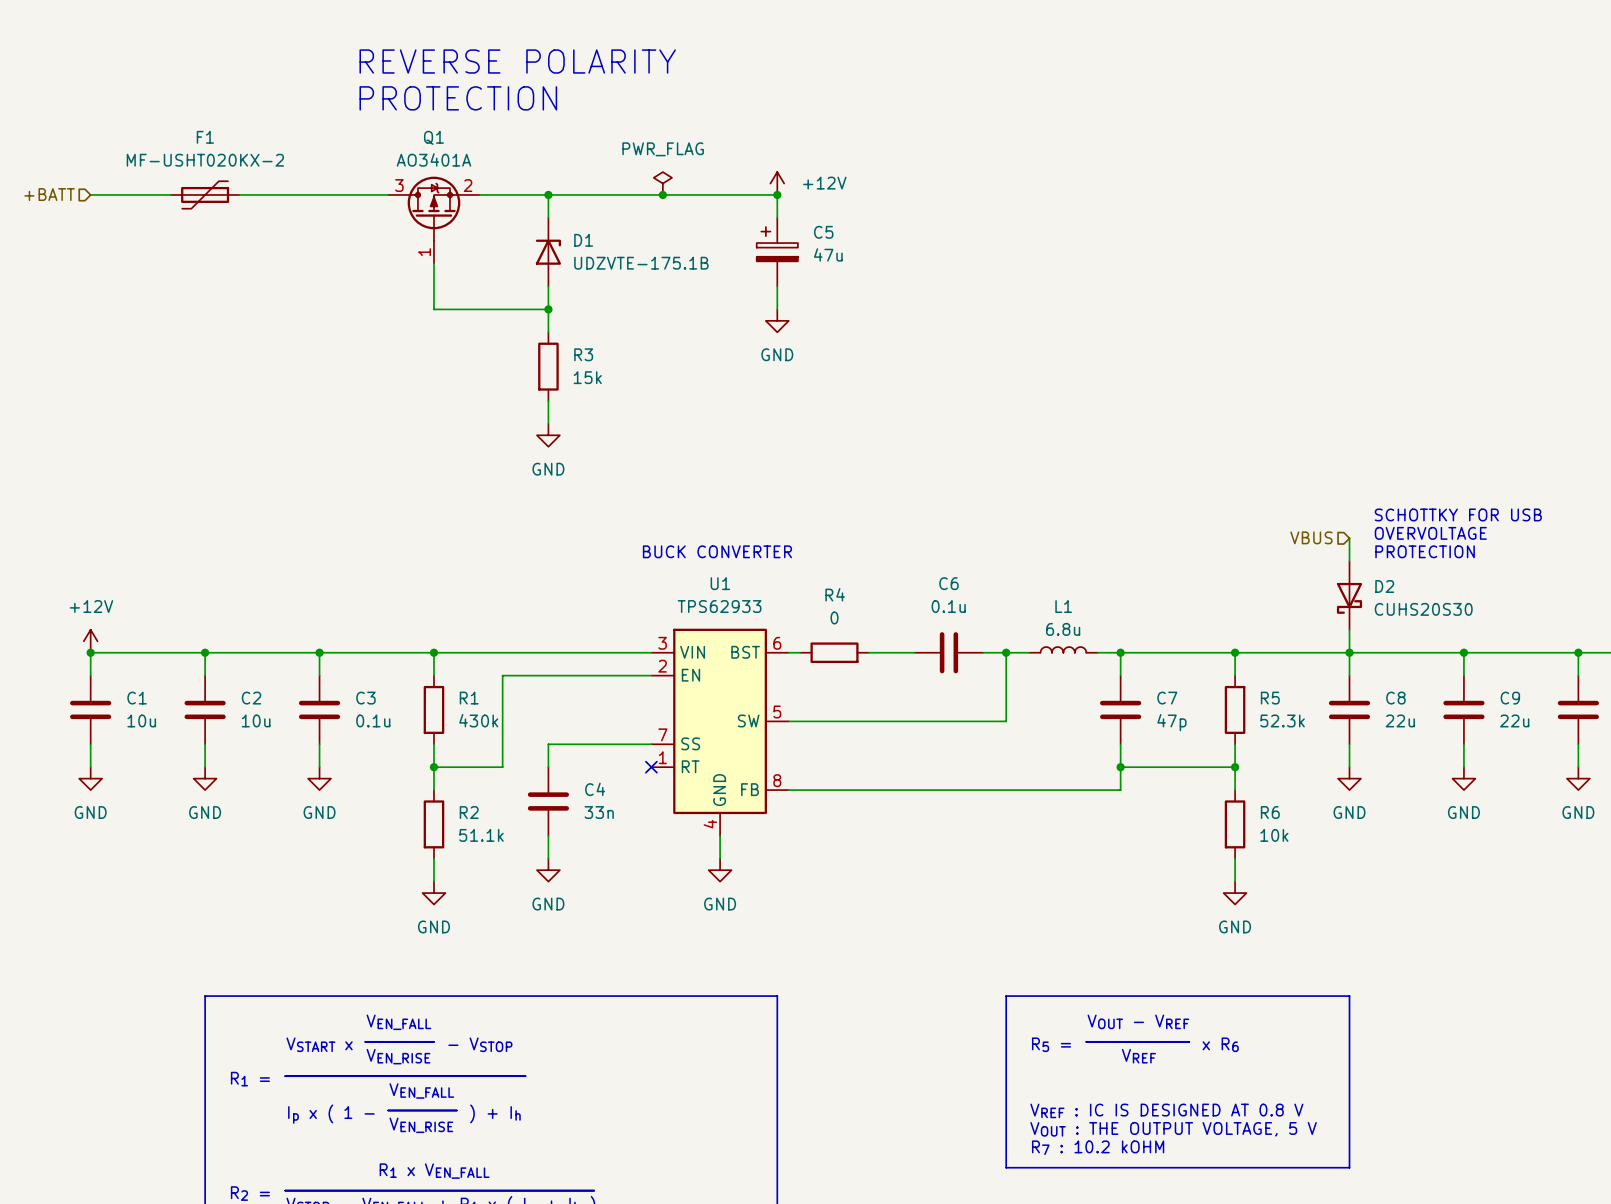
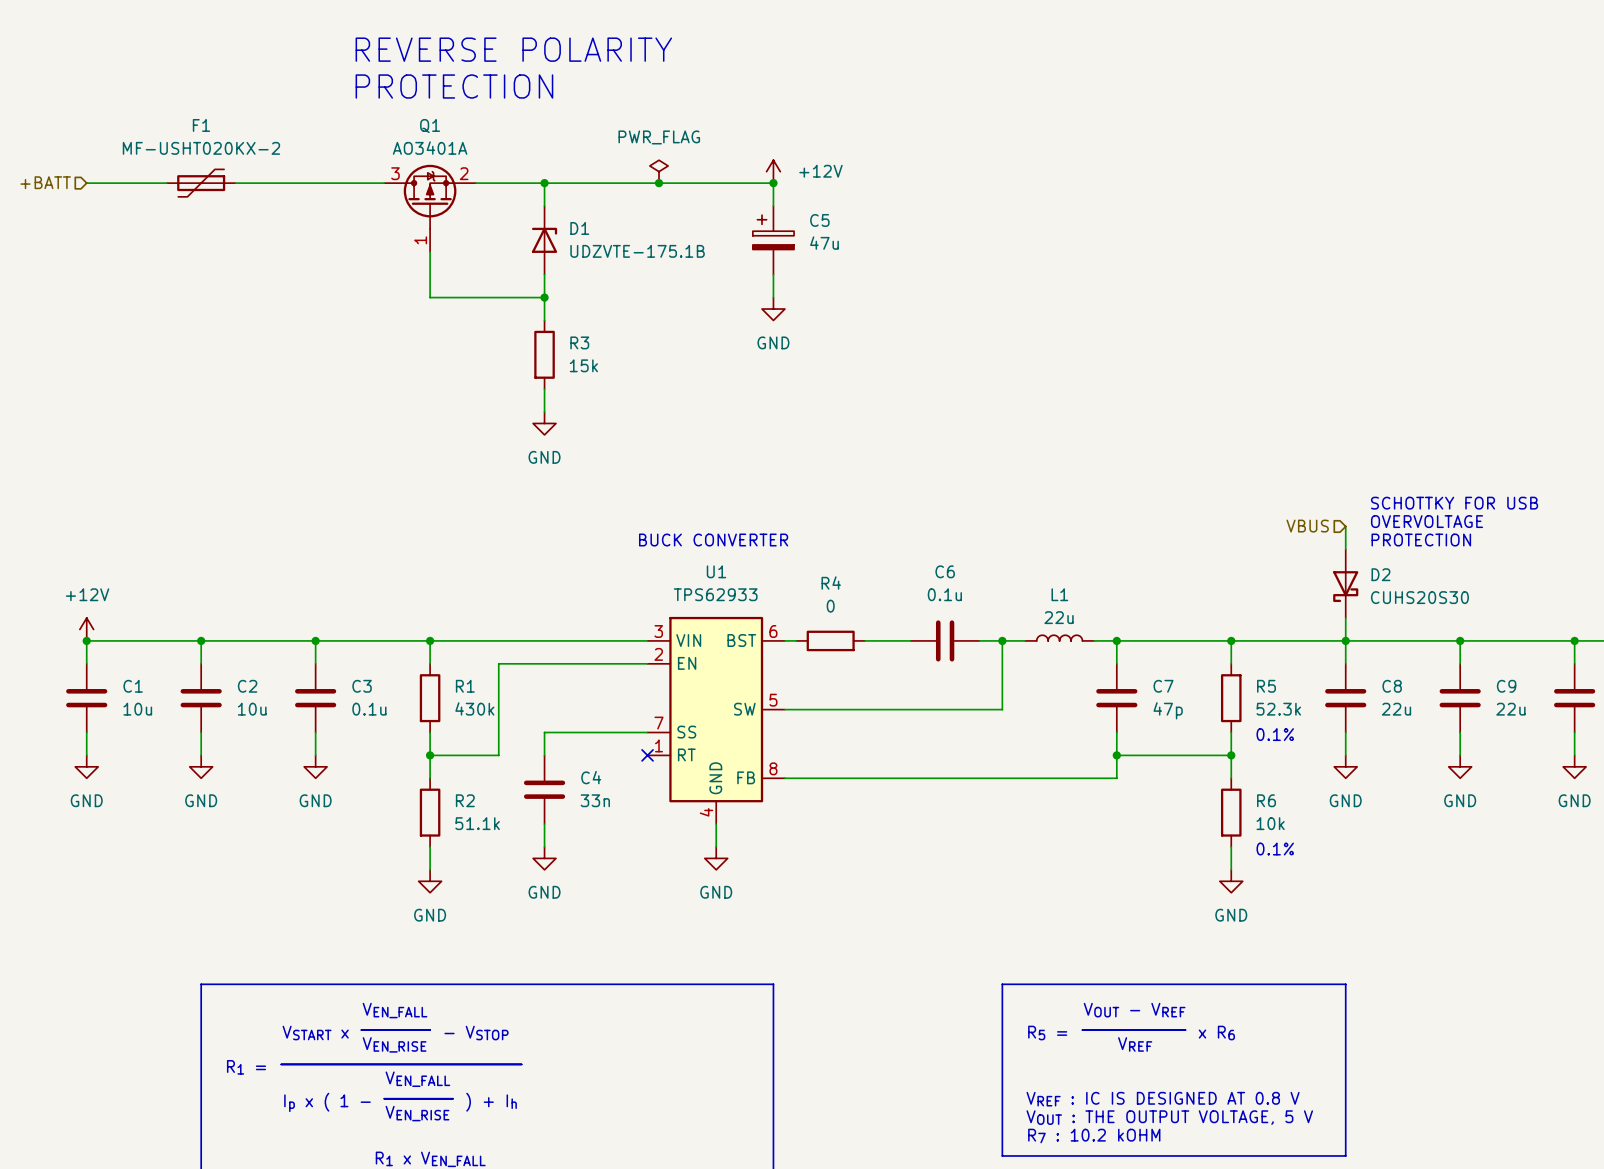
L1 value: 6.8u (1063, 629) -> 22u (1059, 617)
text: none -> 0.1% (1275, 734)
text: none -> 0.1% (1275, 849)

